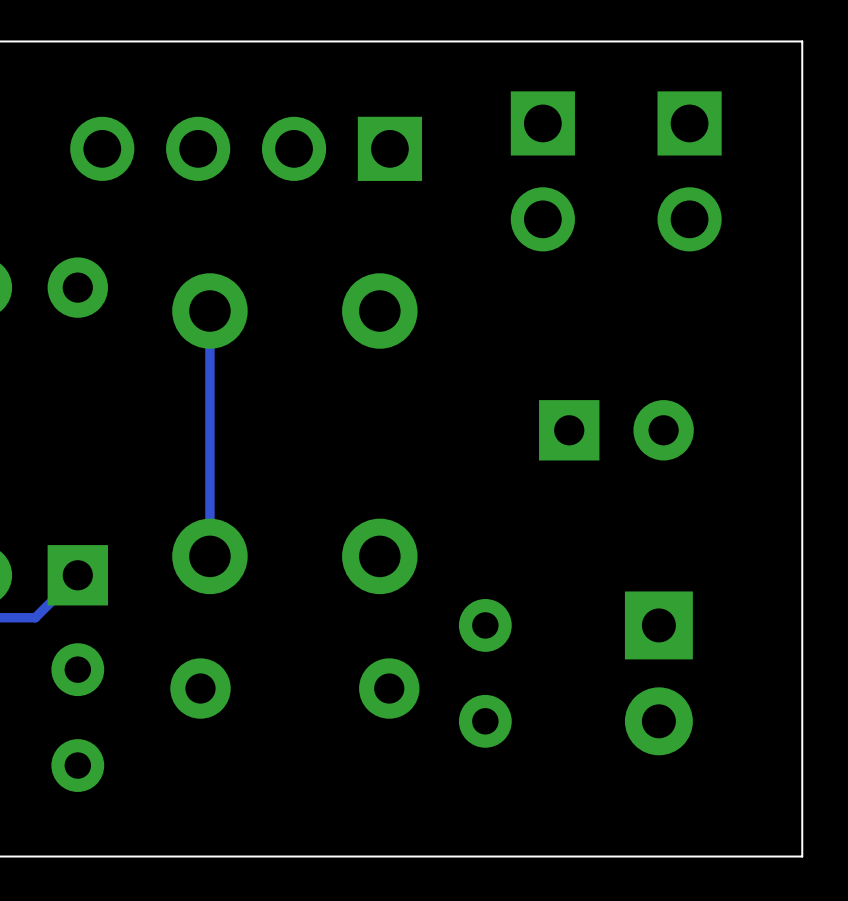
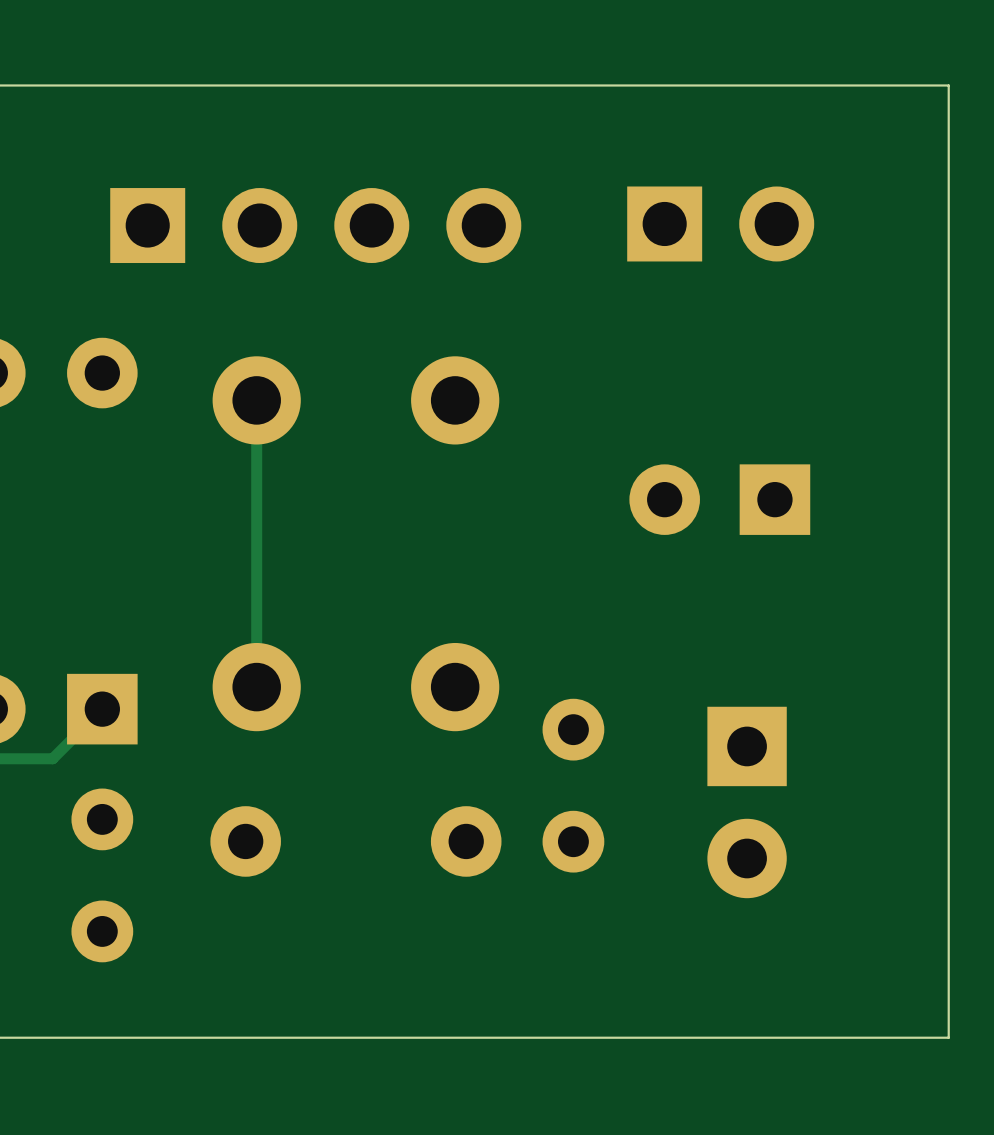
part rotation: 0° (246, 148) -> 180° (315, 225)
part: none -> (720, 223)
part: (542, 171) -> none
part: (689, 171) -> none
part rotation: 0° (616, 430) -> 180° (719, 499)
part position: (485, 673) -> (573, 785)
part position: (658, 673) -> (747, 802)

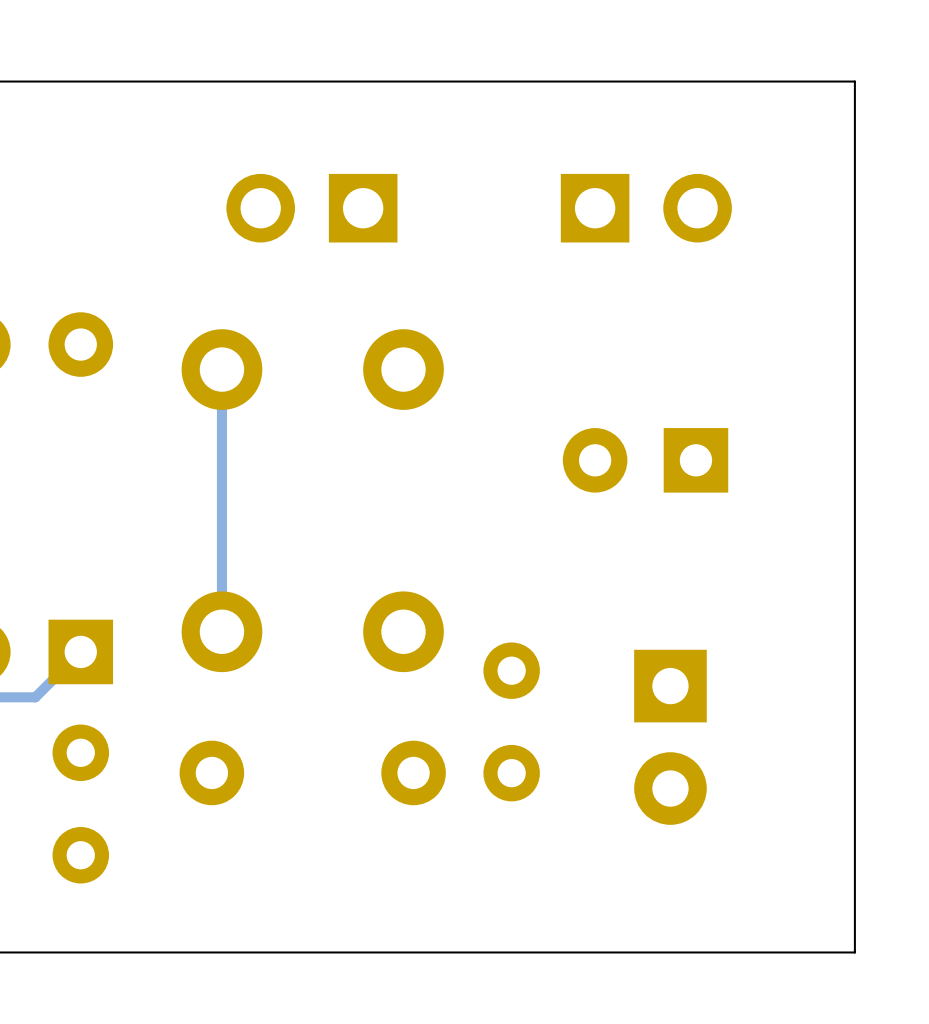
part footprint: [110, 188, 522, 264] -> [226, 173, 398, 243]

